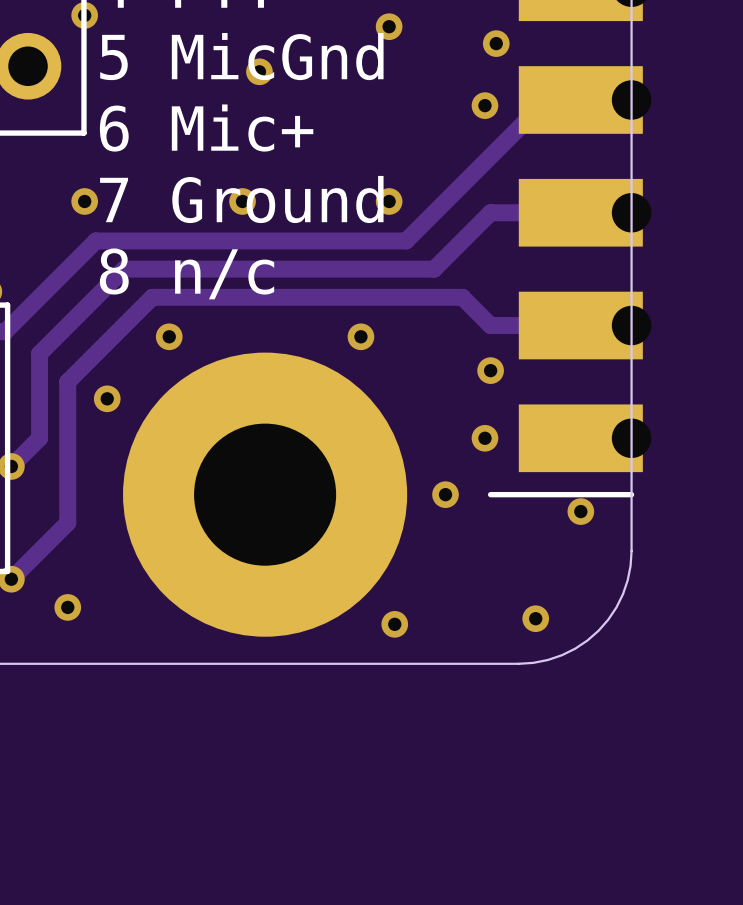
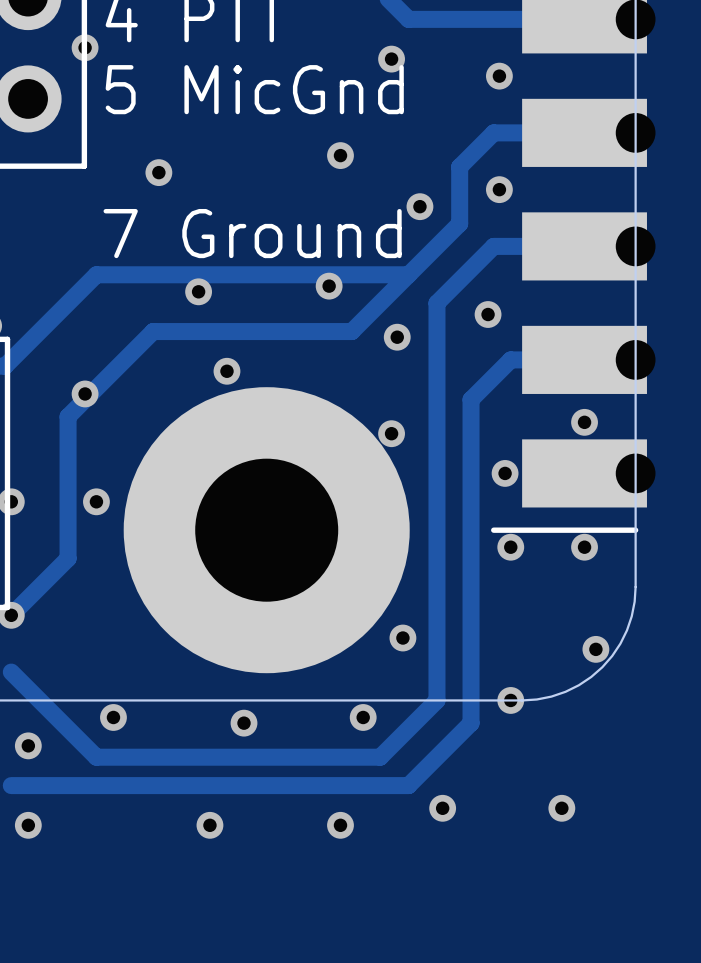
via: (259, 71) -> none
track: (547, 99) (456, 190) -> (550, 132) (493, 132) (459, 166) (459, 223)
via: (484, 105) -> none
via: none -> (340, 155)
text: 6 Mic+ (206, 128) -> none
via: none -> (158, 172)
via: none -> (499, 189)
via: none -> (419, 206)
via: (84, 201) -> none
via: (242, 201) -> none
via: (389, 201) -> none
via: none -> (329, 286)
via: none -> (198, 291)
track: (434, 269) (124, 269) (39, 353) (39, 438) (11, 466) -> (436, 303) (436, 700) (380, 757) (96, 757) (11, 672)
text: 8 n/c (186, 273) -> none
via: none -> (488, 314)
track: (349, 297) (462, 297) (490, 325) (507, 325) -> (351, 331) (408, 274)
via: none -> (397, 337)
track: none -> (510, 359) (471, 399) (471, 723) (408, 785) (11, 785)
via: (169, 336) -> none
via: none -> (226, 371)
via: (360, 336) -> none
via: none -> (85, 393)
via: (490, 370) -> none
via: none -> (584, 422)
via: (107, 398) -> none
via: none -> (391, 433)
via position: (484, 438) -> (505, 473)
via: none -> (96, 501)
via: (445, 494) -> none
via: none -> (510, 547)
via: (67, 607) -> none
via: none -> (595, 649)
via: (535, 618) -> none
via position: (394, 624) -> (402, 638)
via: none -> (510, 700)
via: none -> (113, 717)
via: none -> (363, 717)
via: none -> (244, 723)
via: none -> (28, 745)
via: none -> (442, 808)
via: none -> (561, 808)
via: none -> (28, 825)
via: none -> (209, 825)
via: none -> (340, 825)

